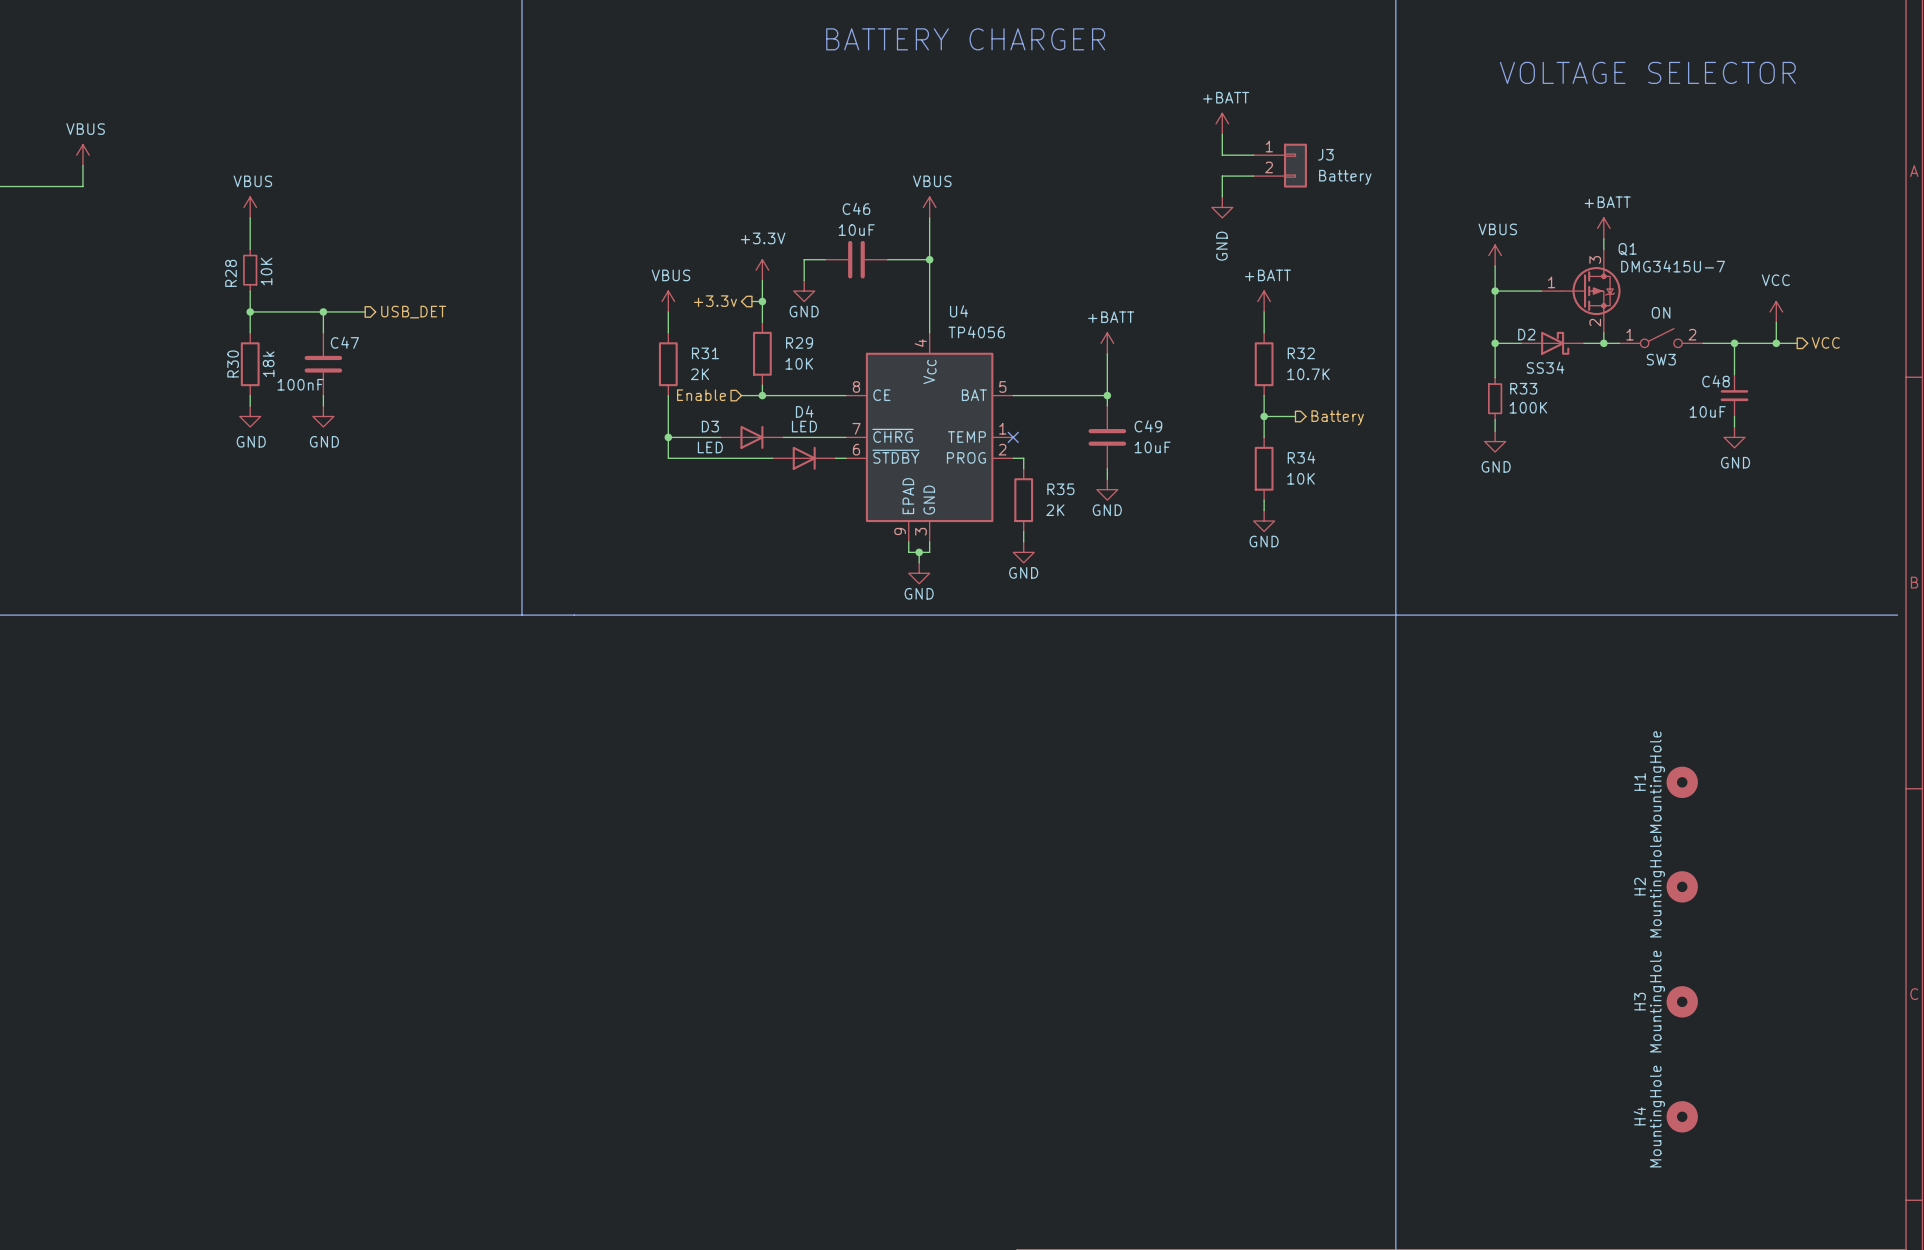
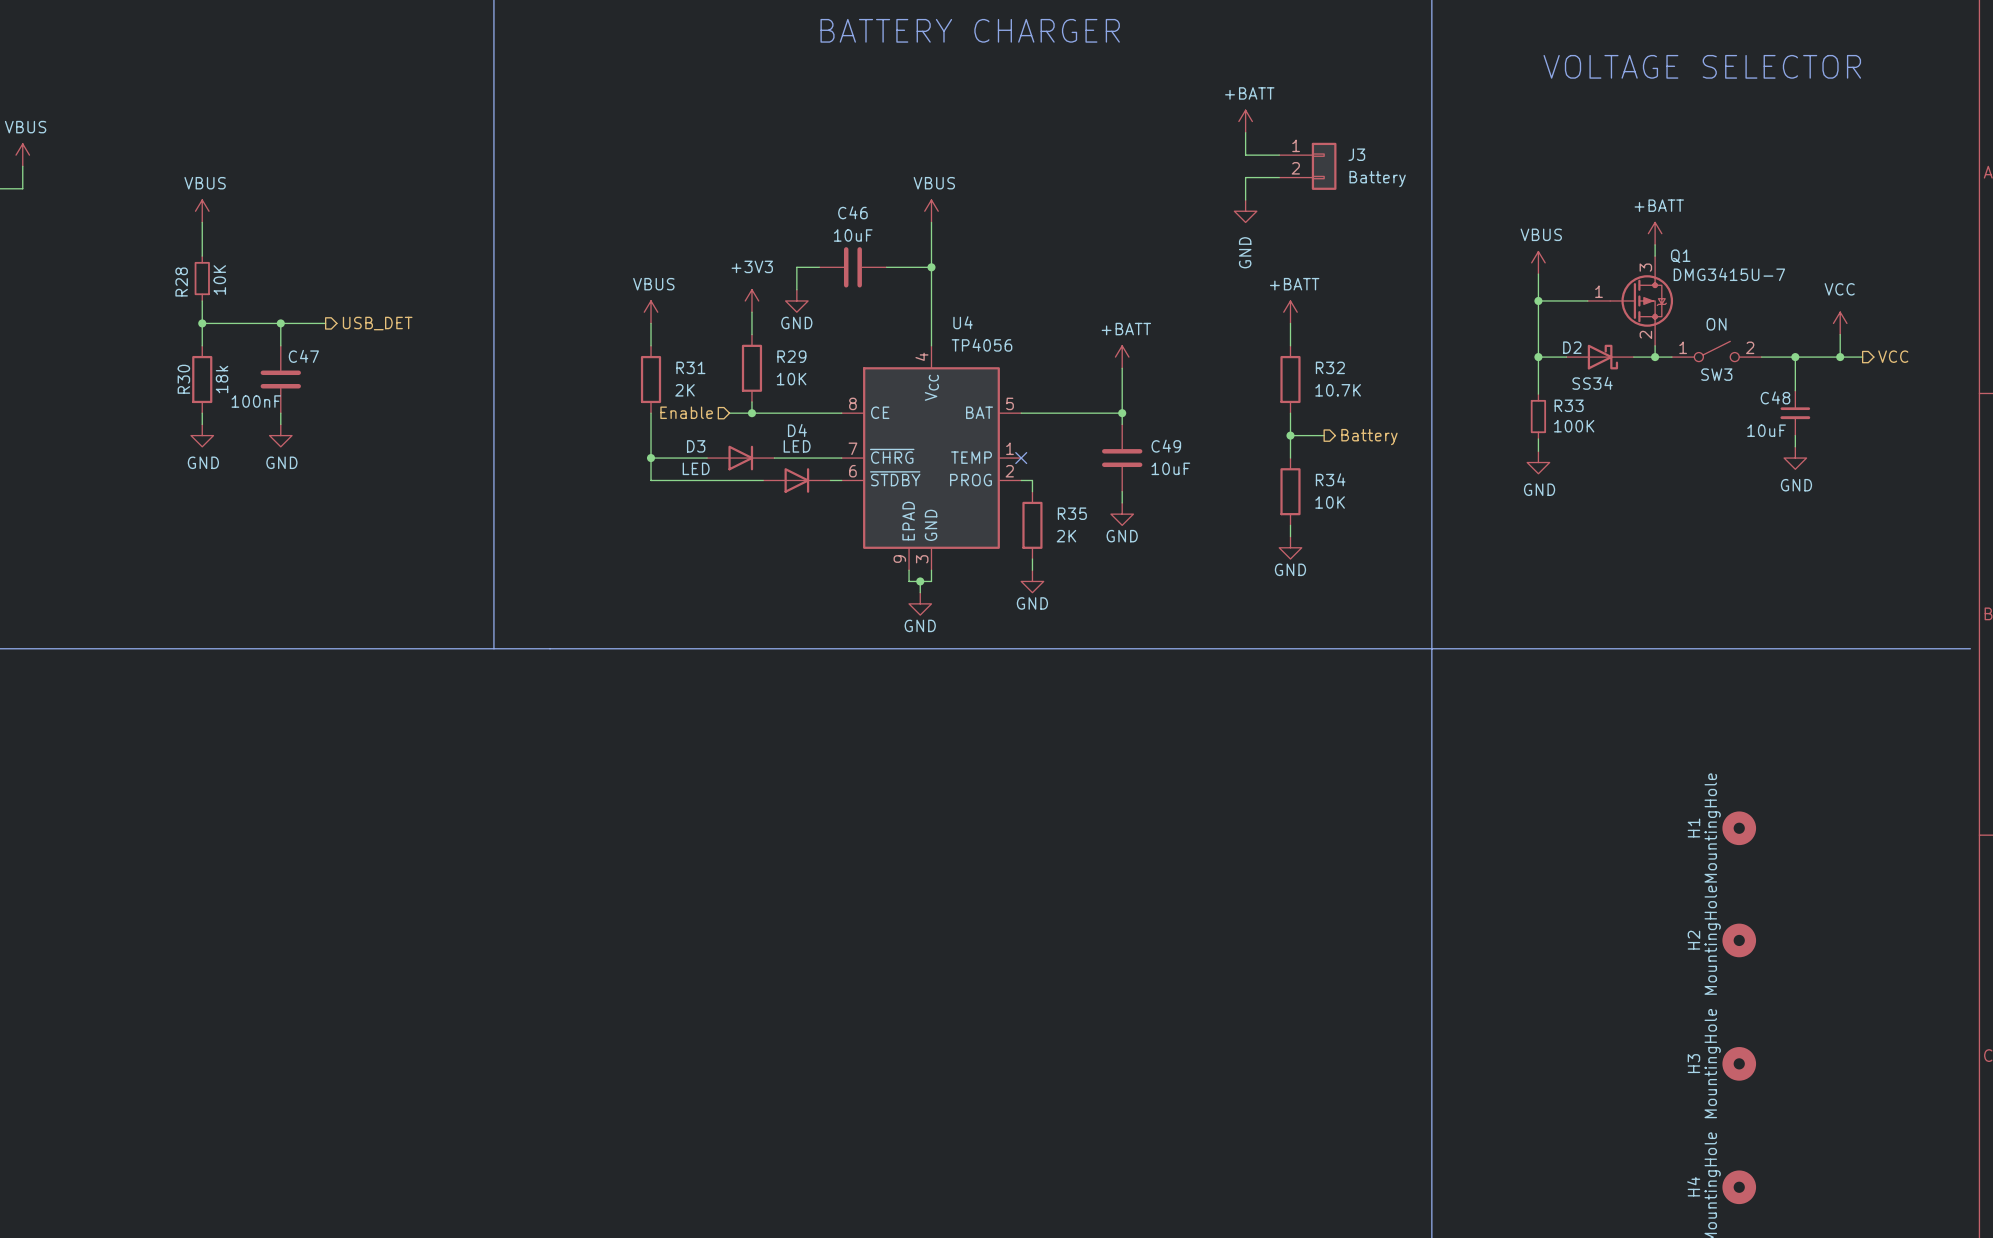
power symbol: +3.3V (762, 270) -> none
power symbol: none -> +3V3 (751, 300)
hierarchical label: +3.3v (715, 301) -> none
junction: (762, 301) -> none

